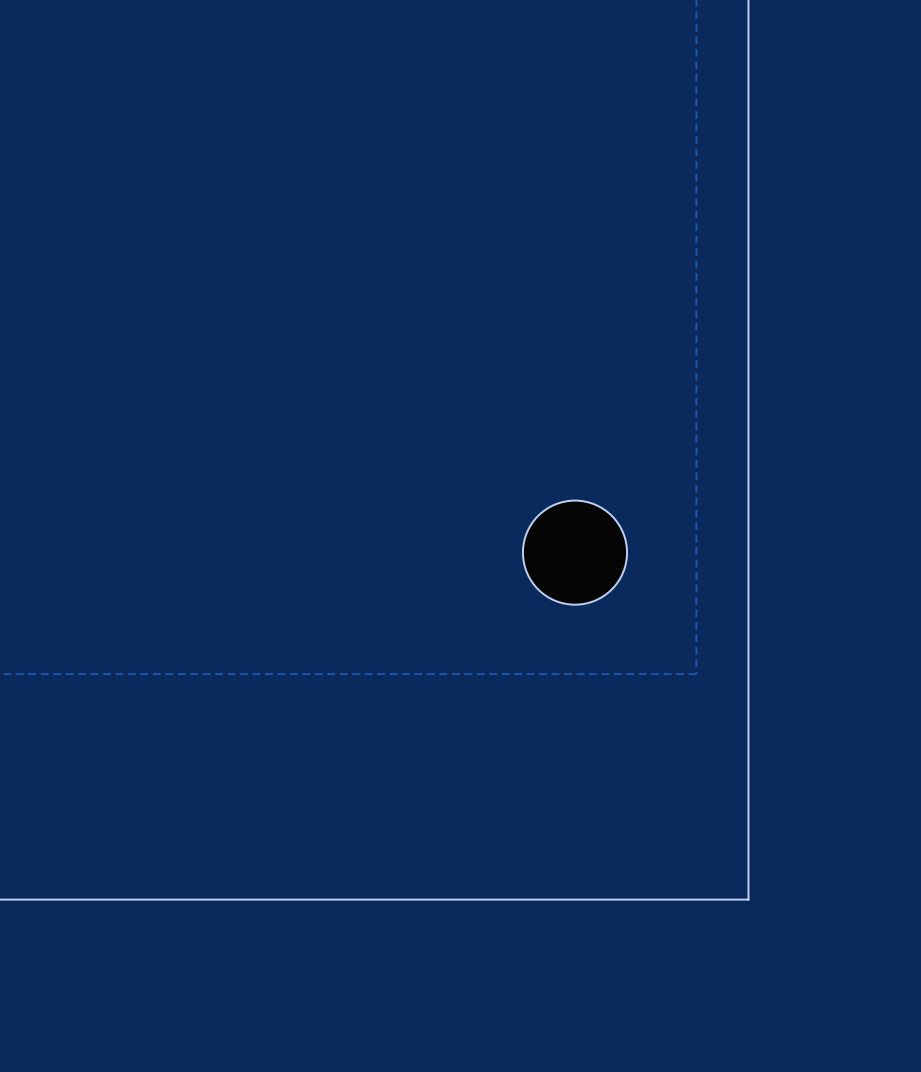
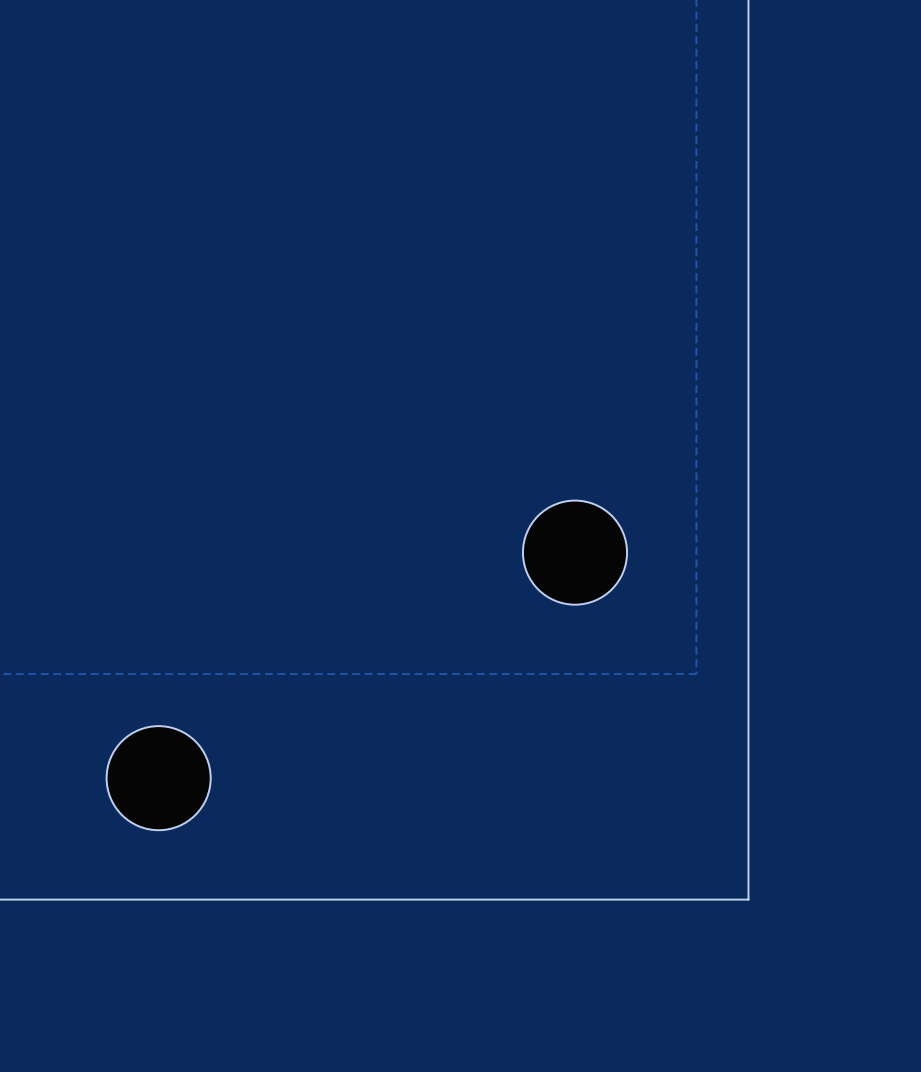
part: none -> (158, 778)

